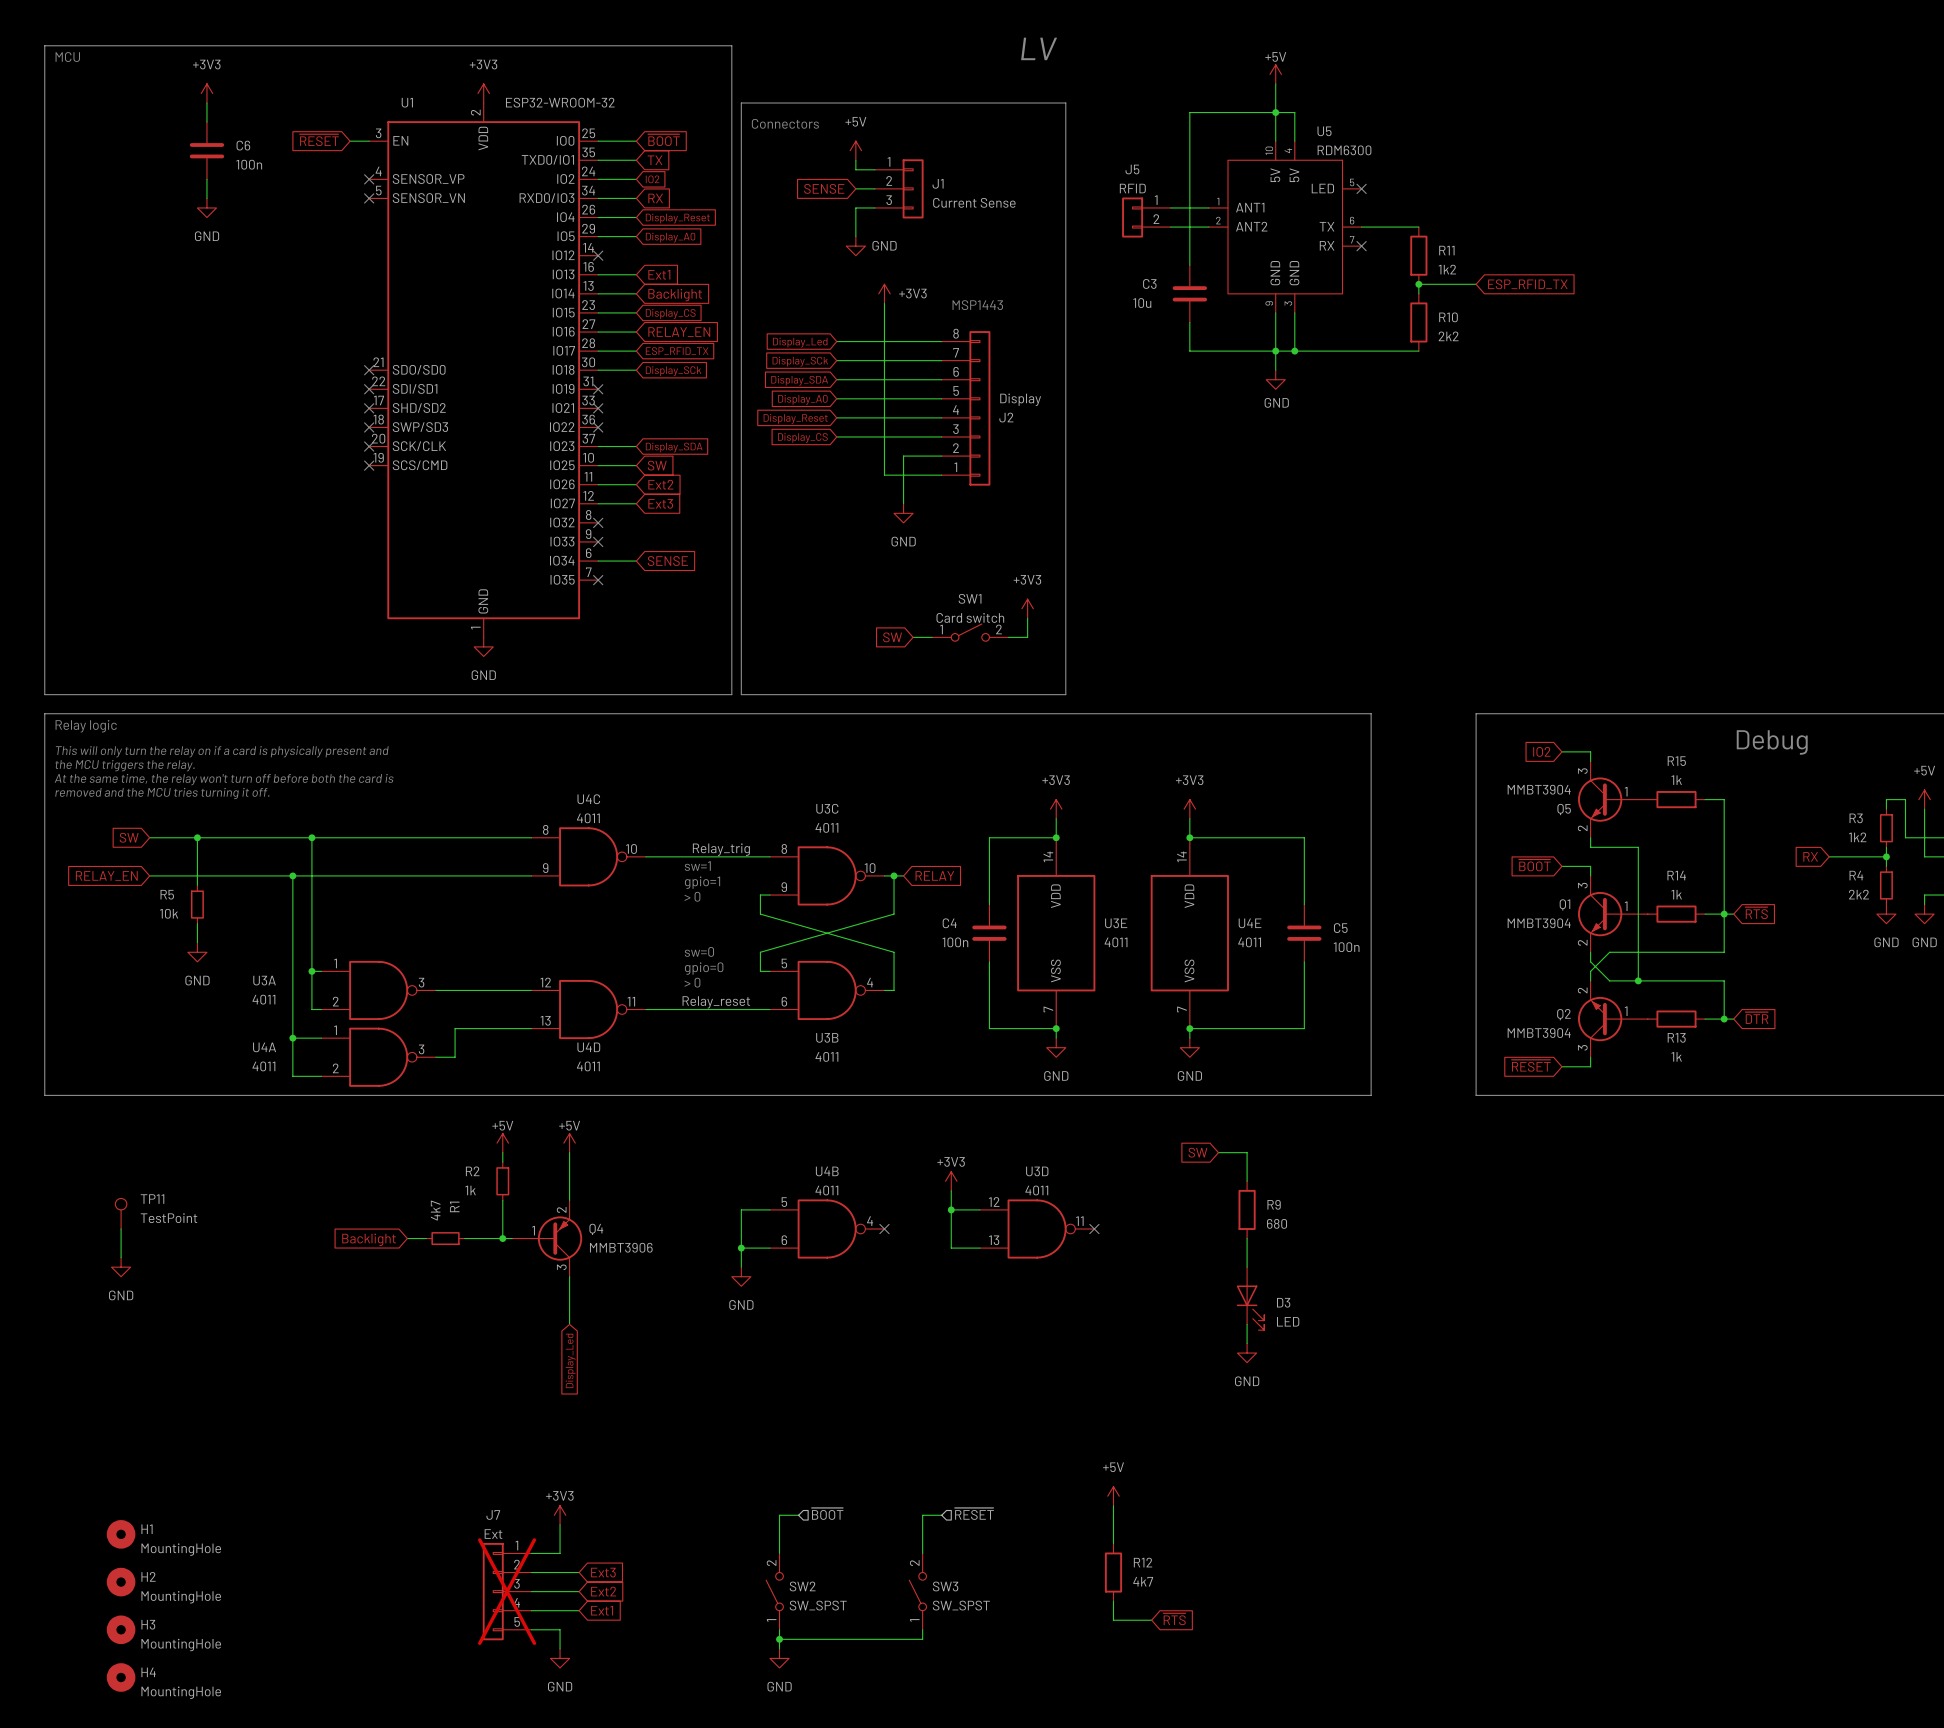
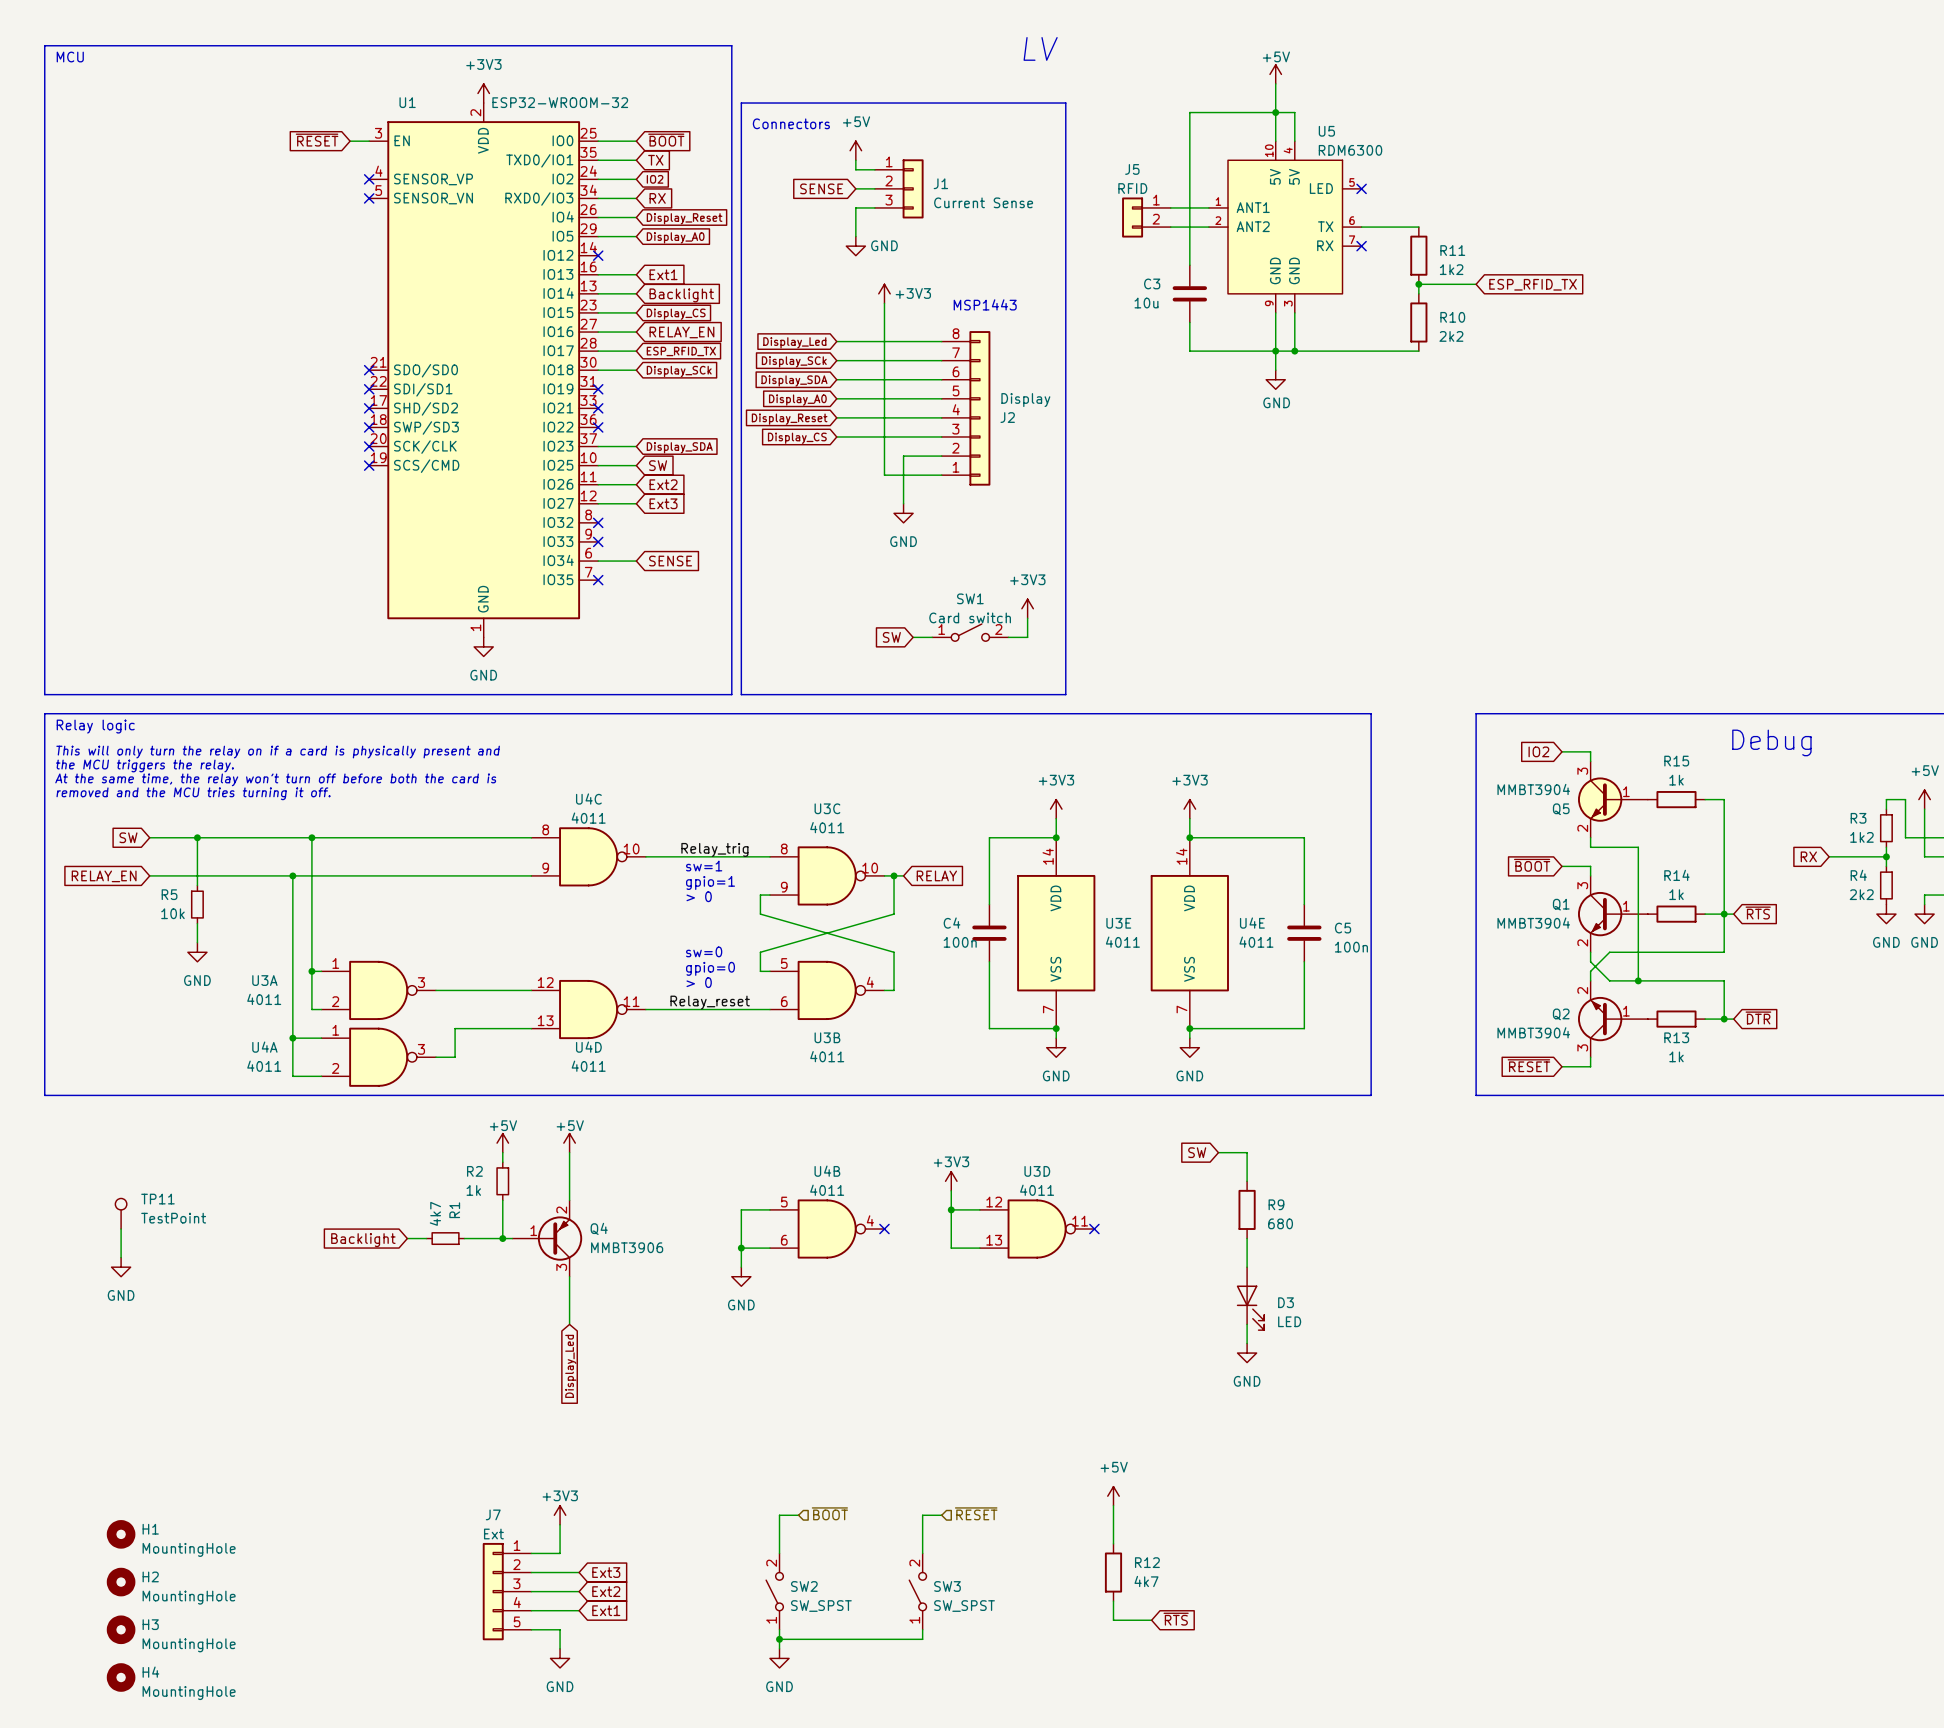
power symbol: +3V3 (206, 93) -> none
wire: (206, 103) (206, 122) -> none
C6: 100n (206, 150) -> none
wire: (206, 179) (206, 198) -> none
power symbol: GND (206, 207) -> none
J7 do-not-place cross: (507, 1591) -> none

